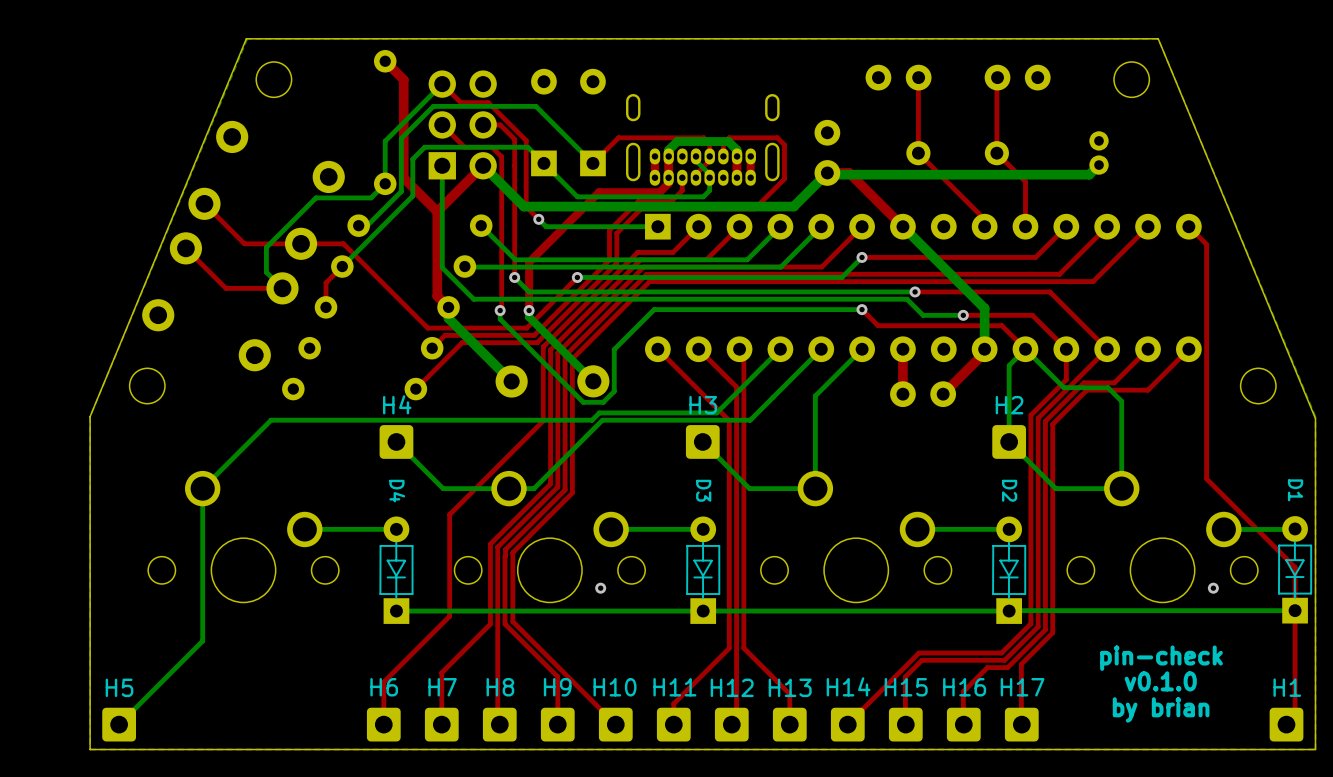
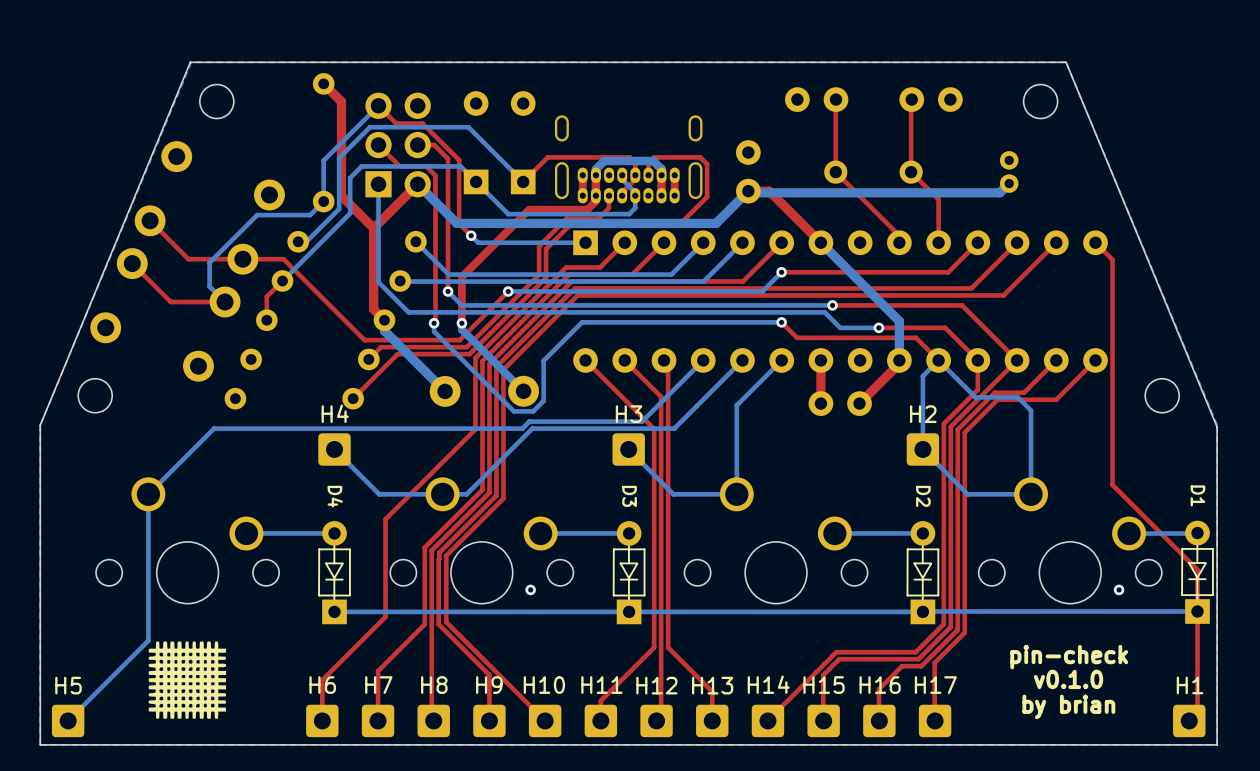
drawing: none -> [148, 641, 227, 719]

